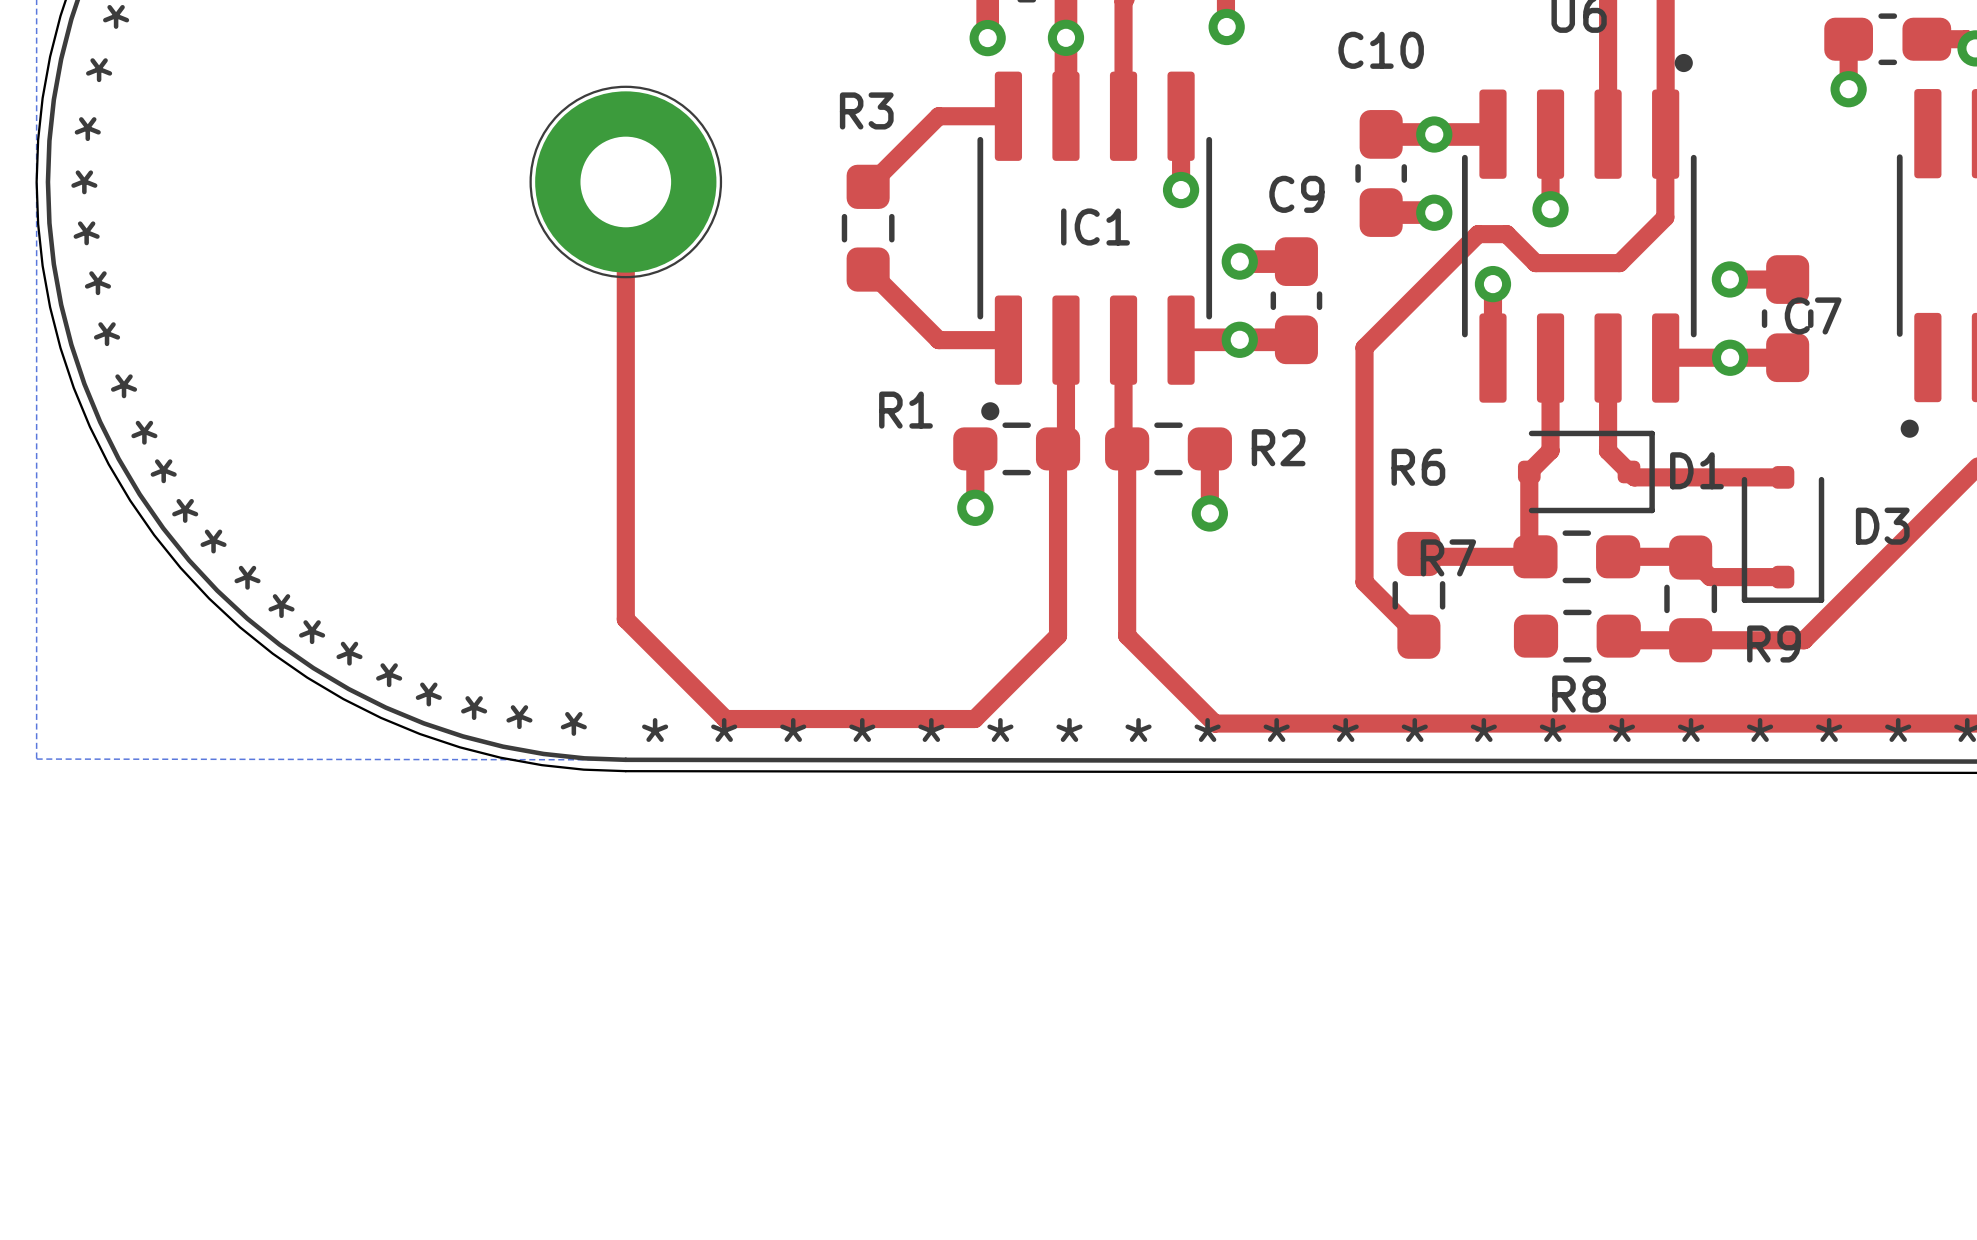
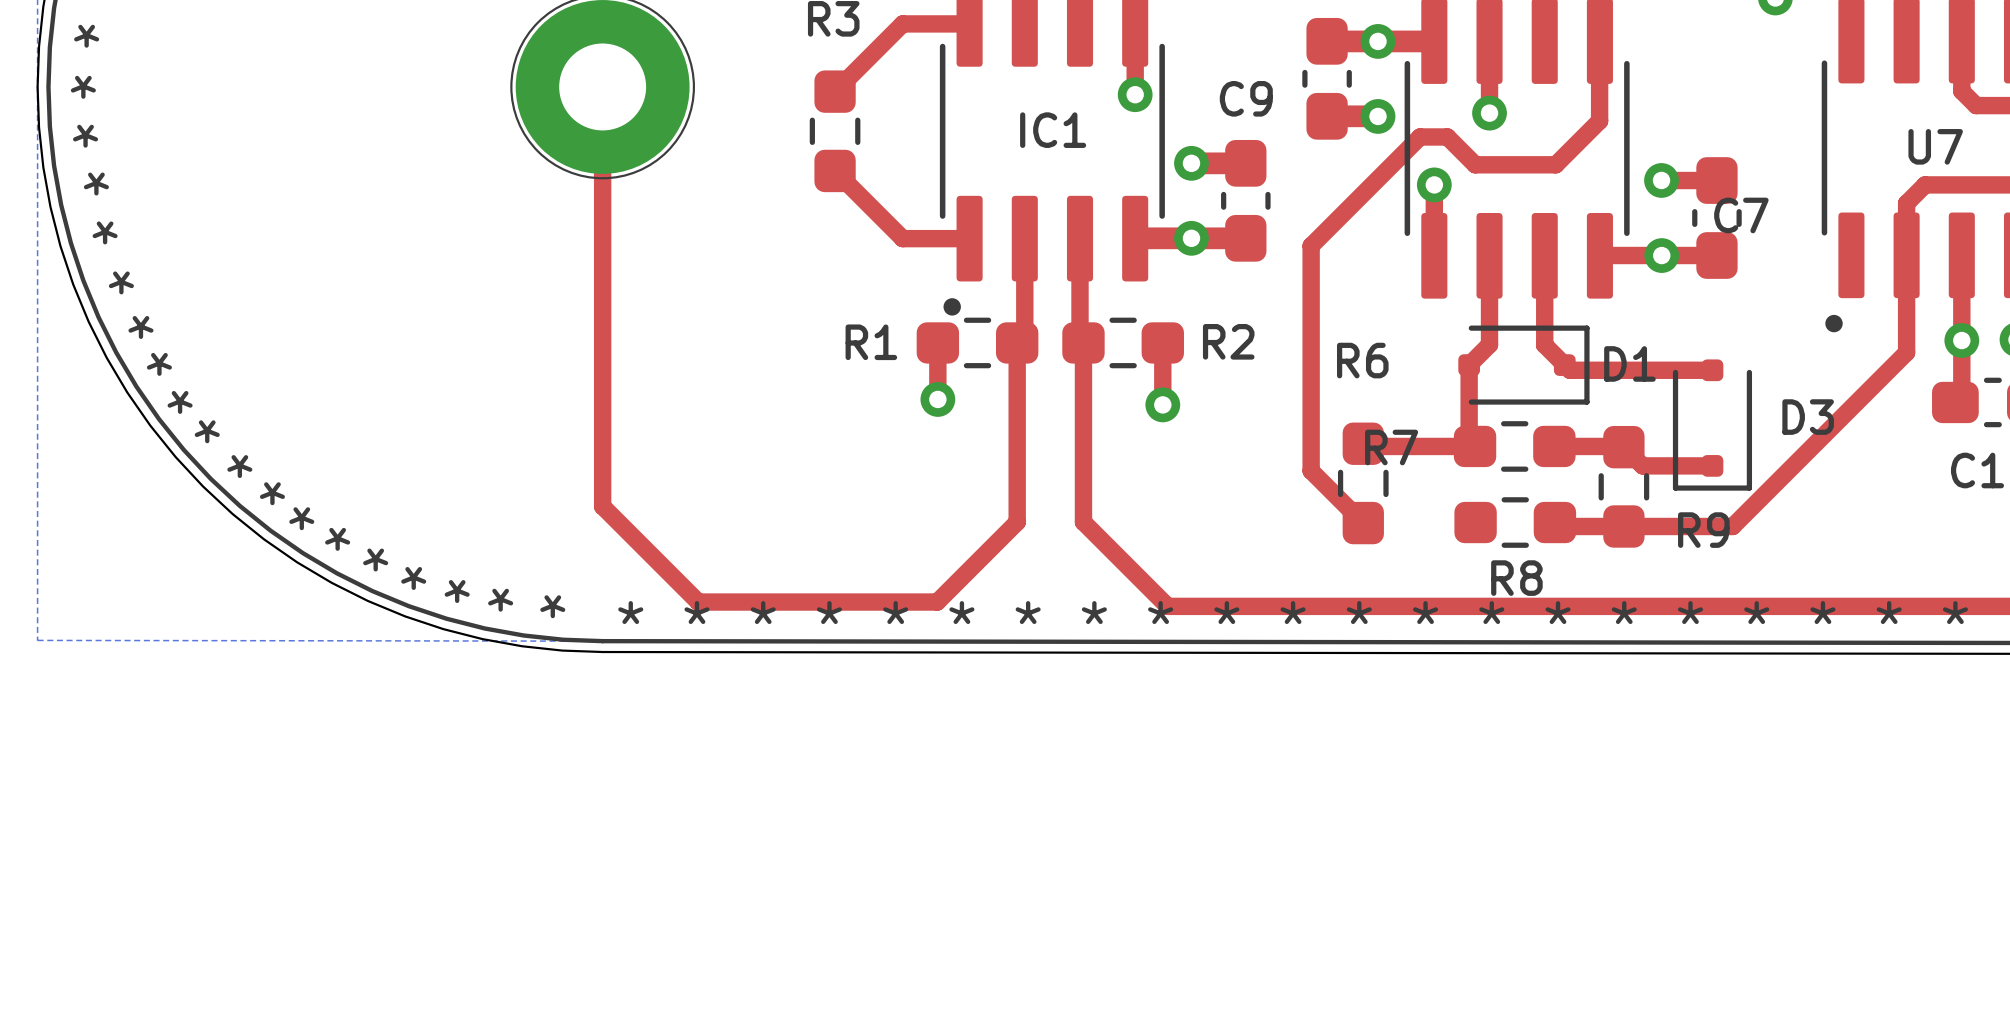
R1 name position: R1 (905, 410) -> R1 (871, 342)

